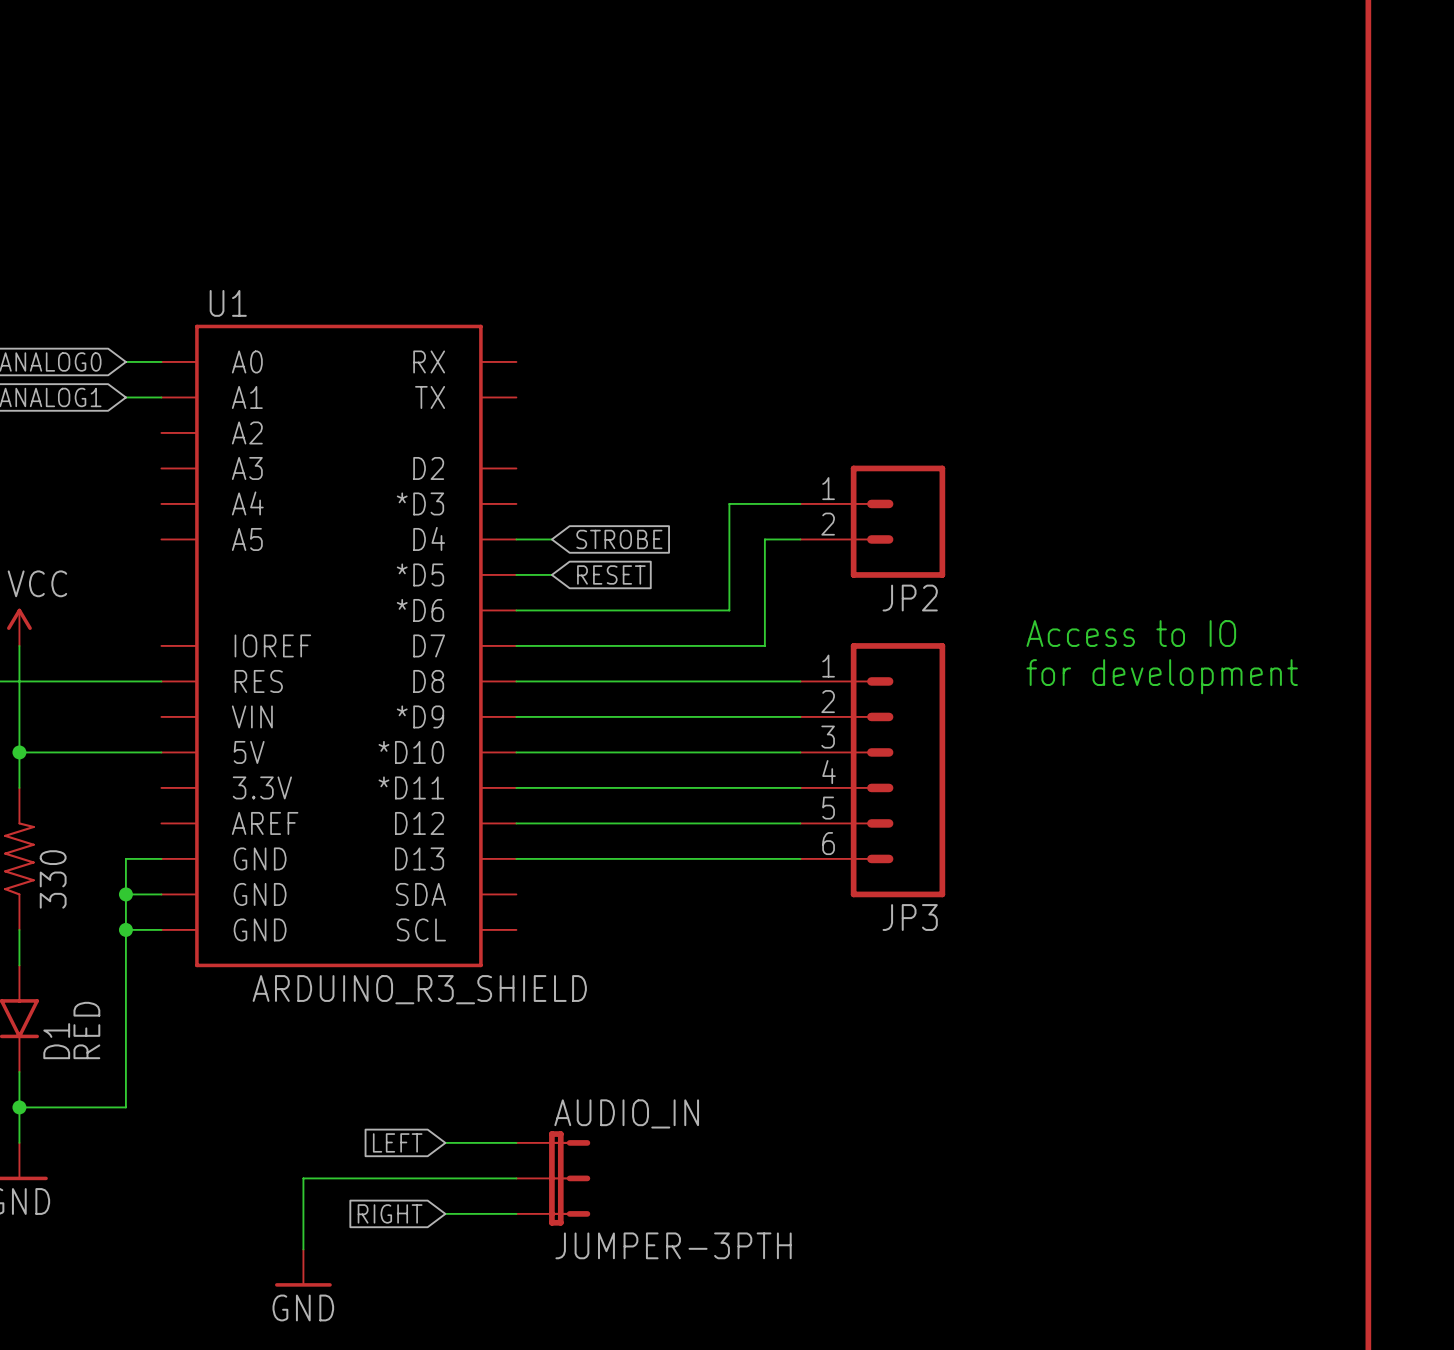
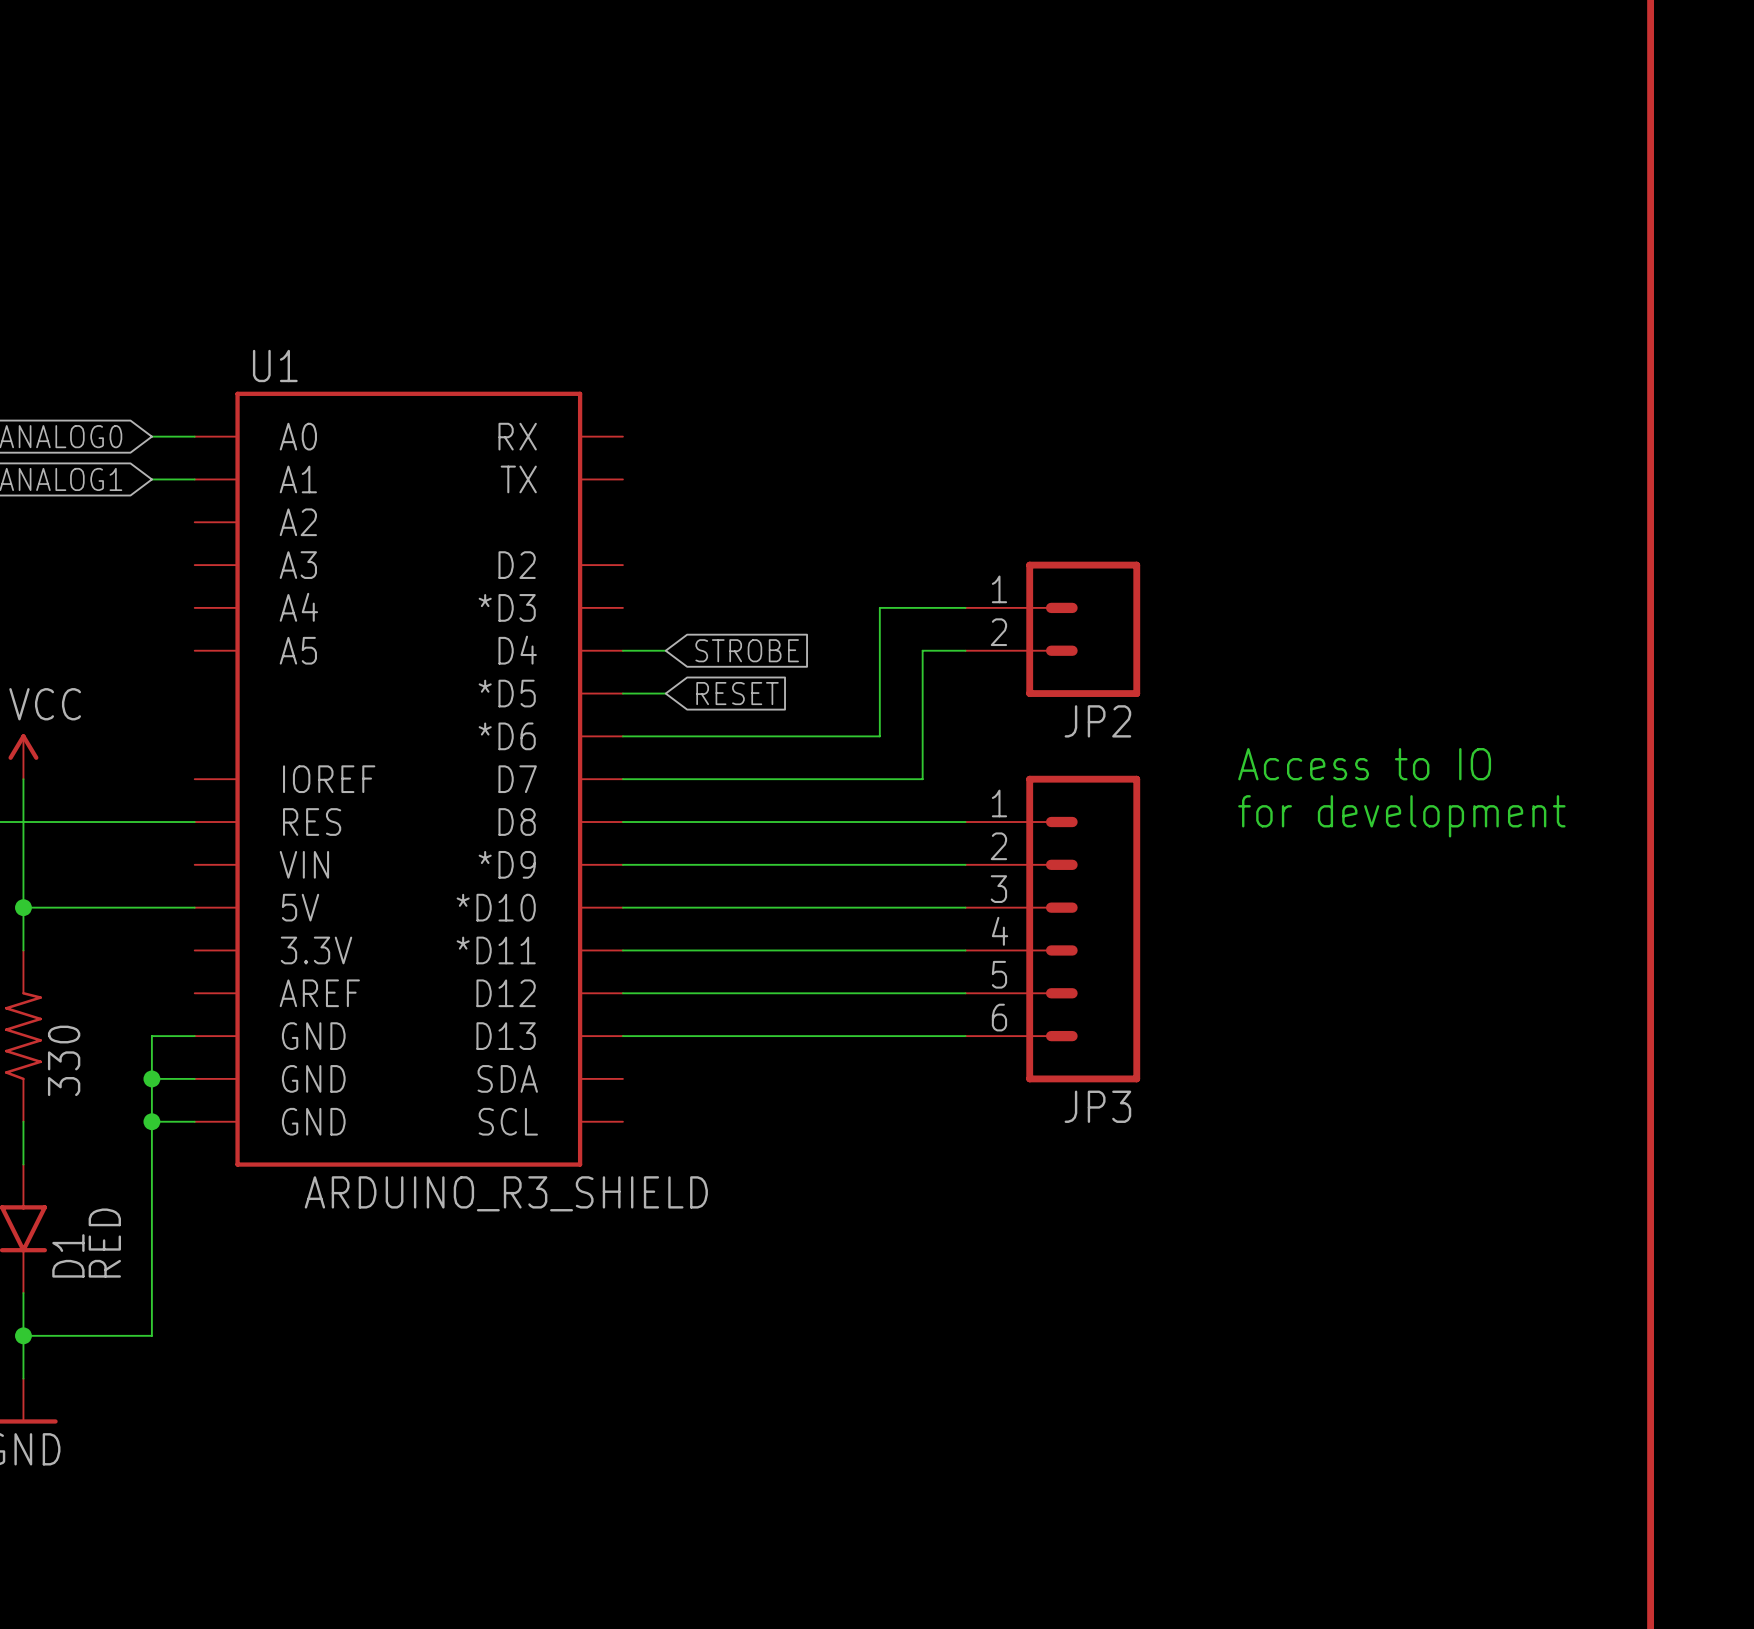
global label: LEFT (397, 1142) -> none
wire: (445, 1142) (516, 1142) -> none
wire: (516, 1178) (303, 1178) (303, 1249) -> none
AUDIO_IN: JUMPER-3PTH (553, 1178) -> none
global label: RIGHT (390, 1213) -> none
wire: (445, 1213) (516, 1213) -> none
power symbol: GND (303, 1268) -> none

